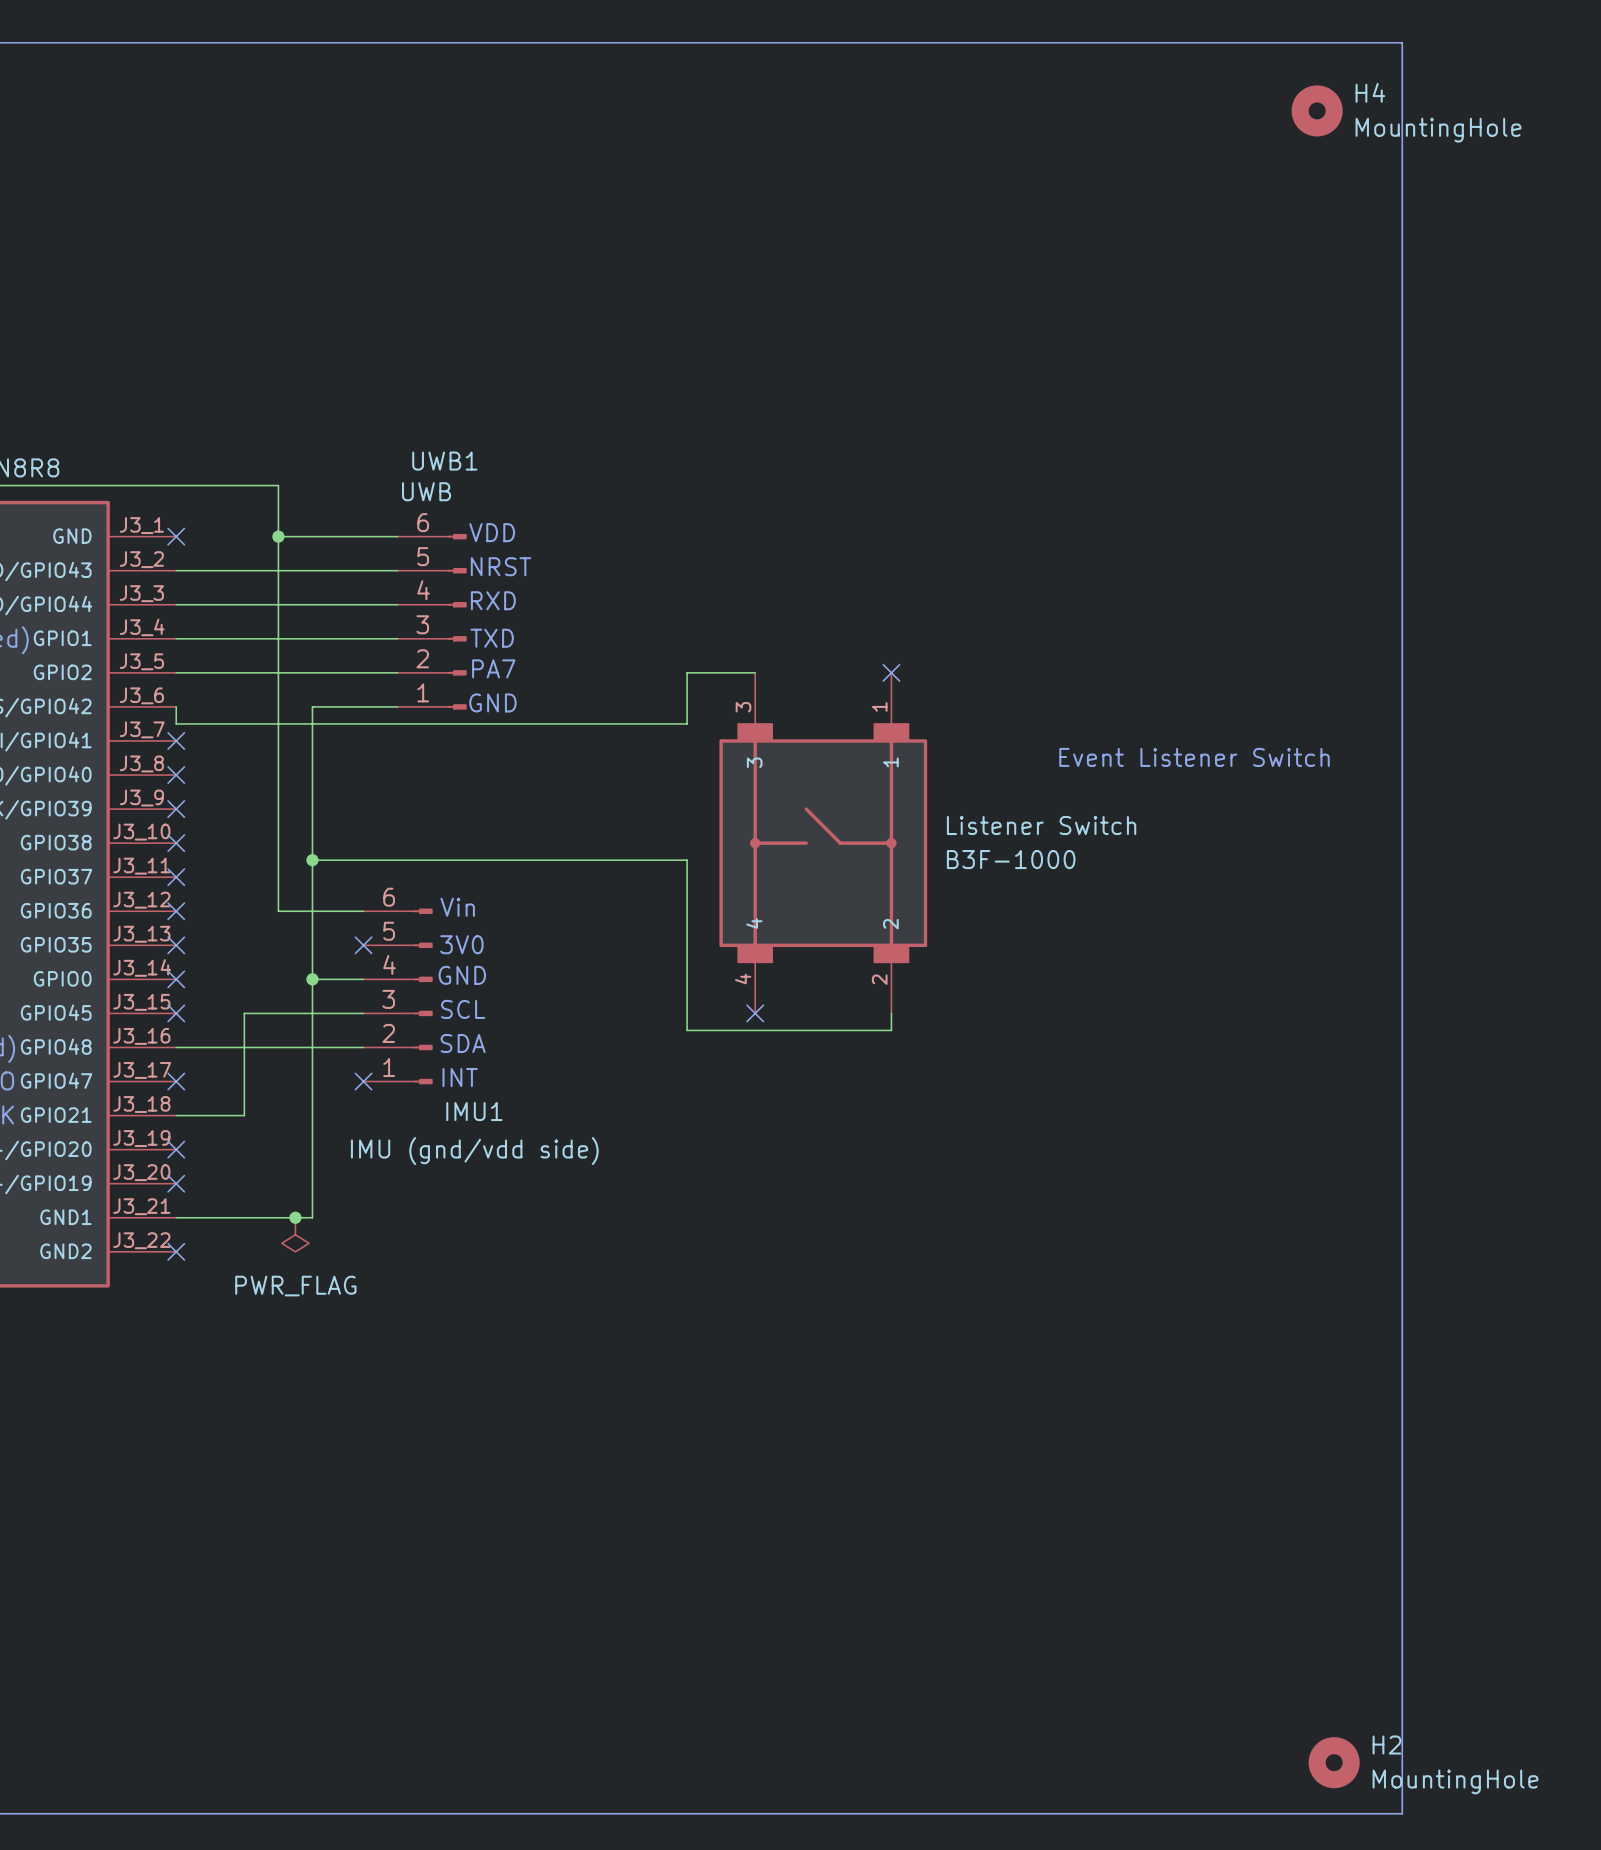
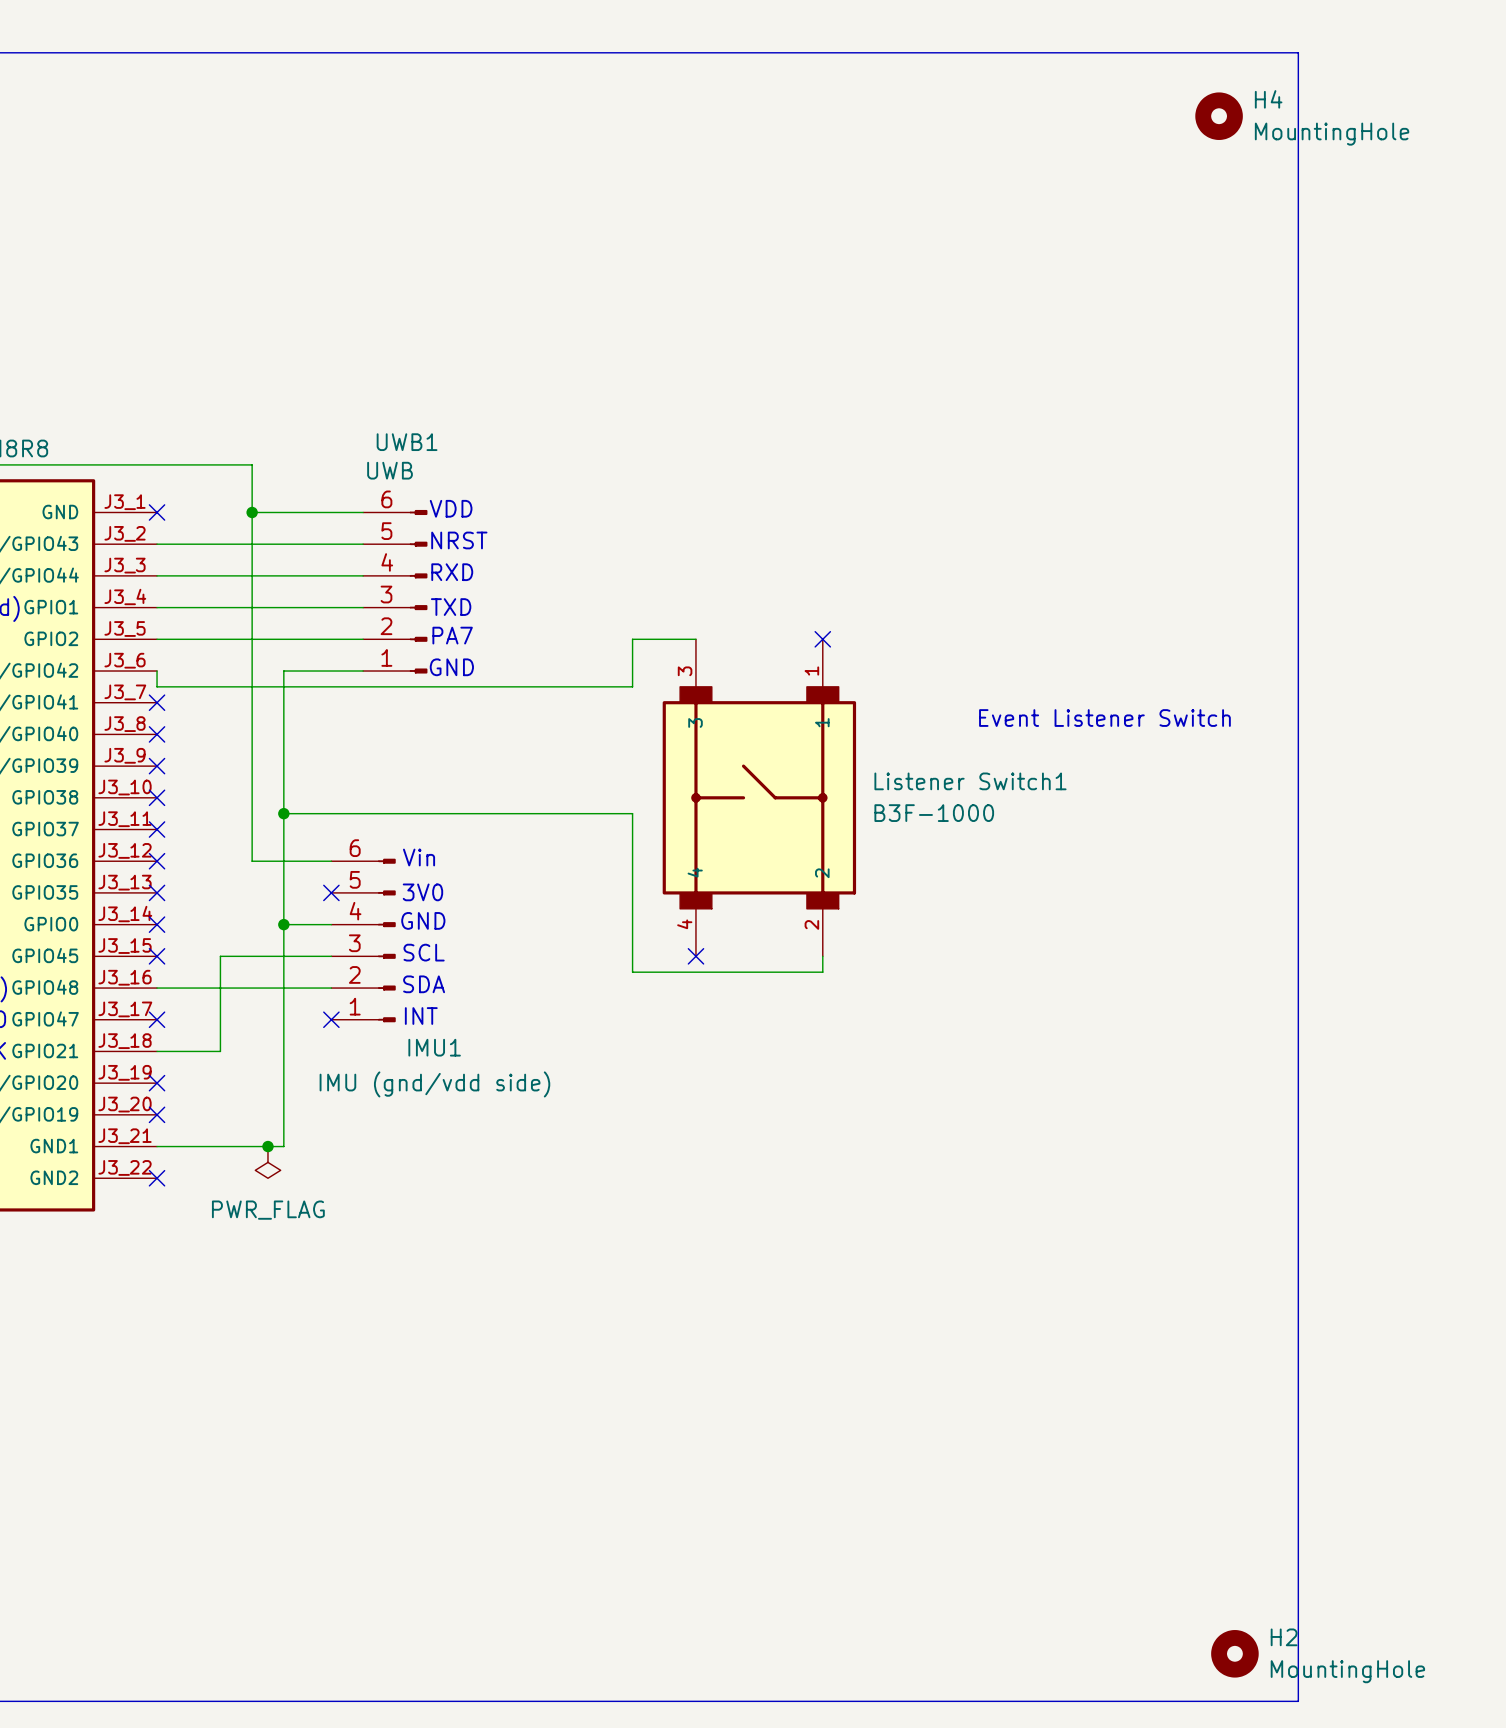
Listener Switch name: Listener Switch (1041, 825) -> Listener Switch1 (970, 781)

